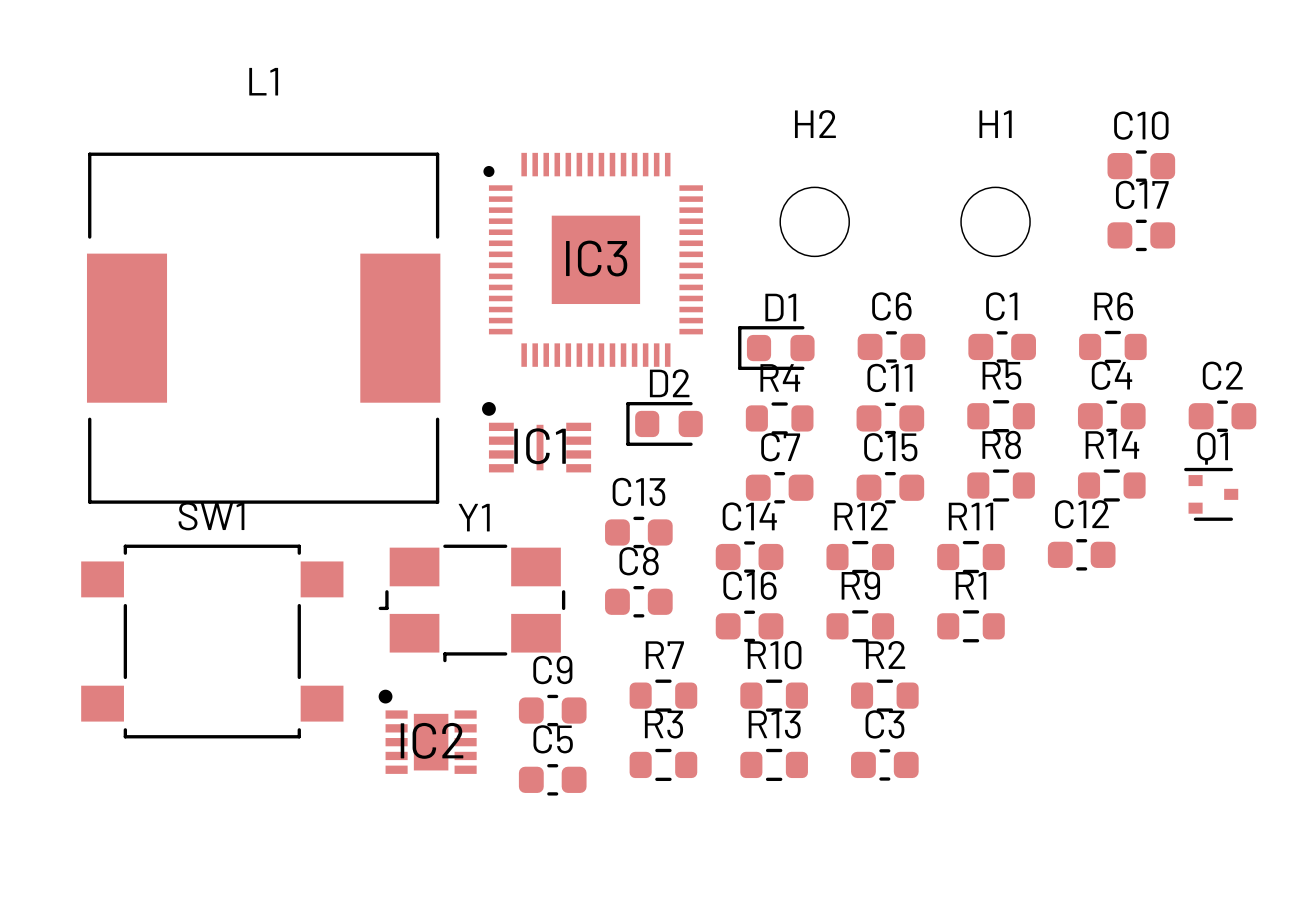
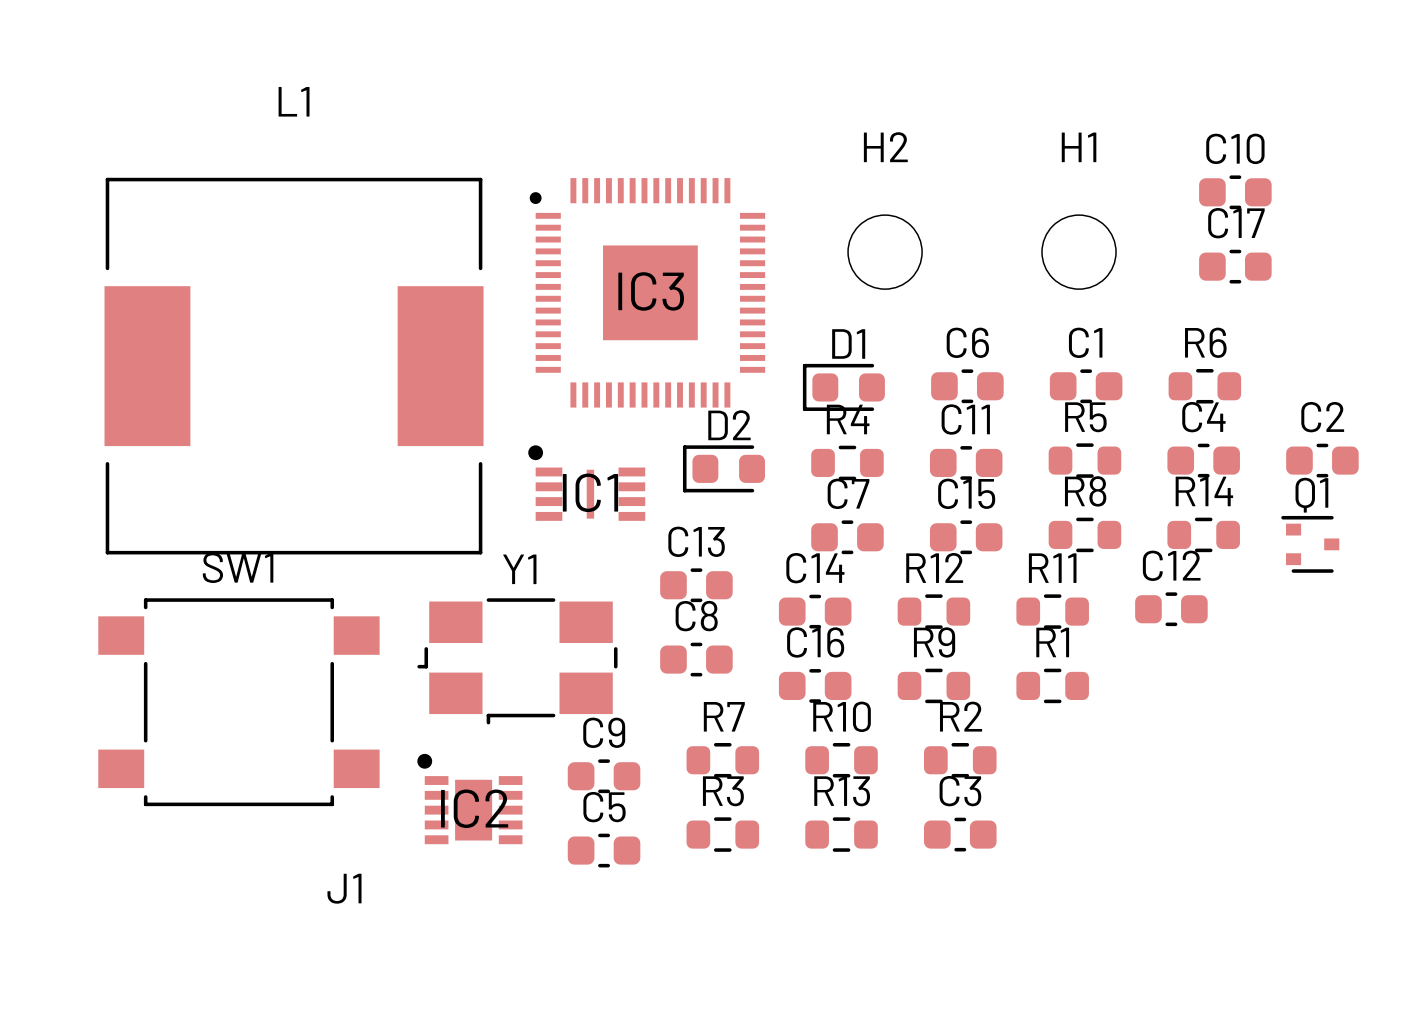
J1: none -> (344, 888)

